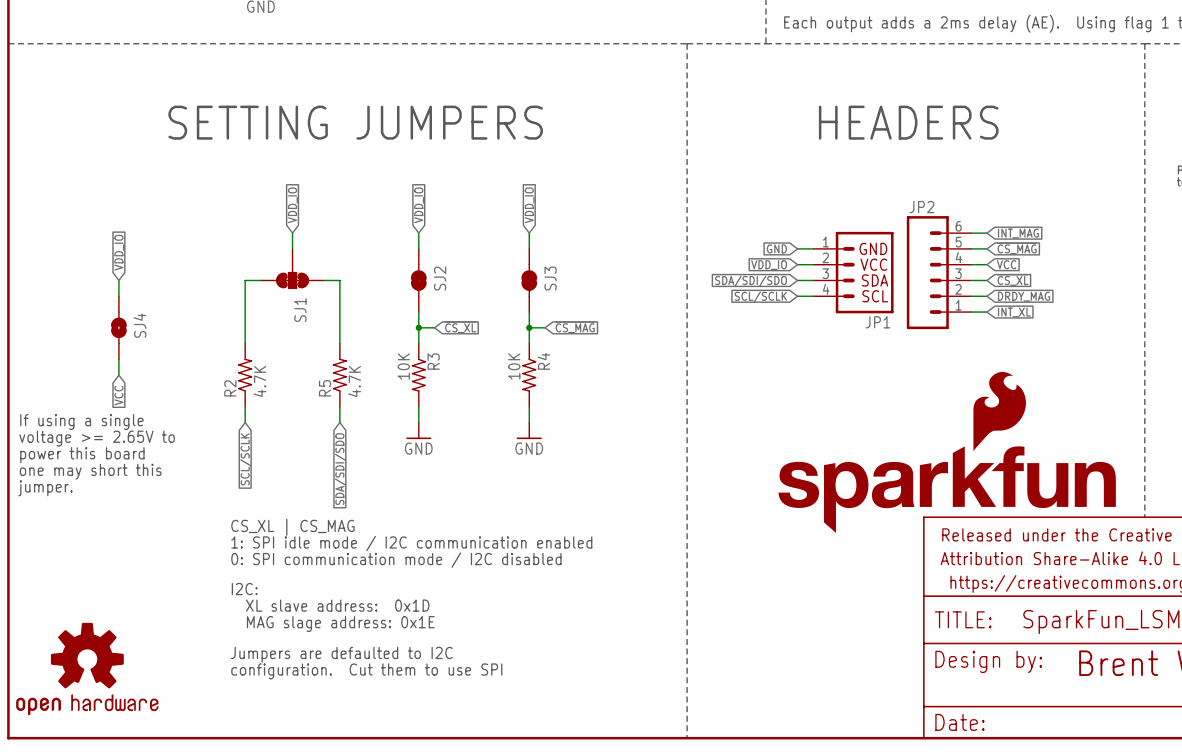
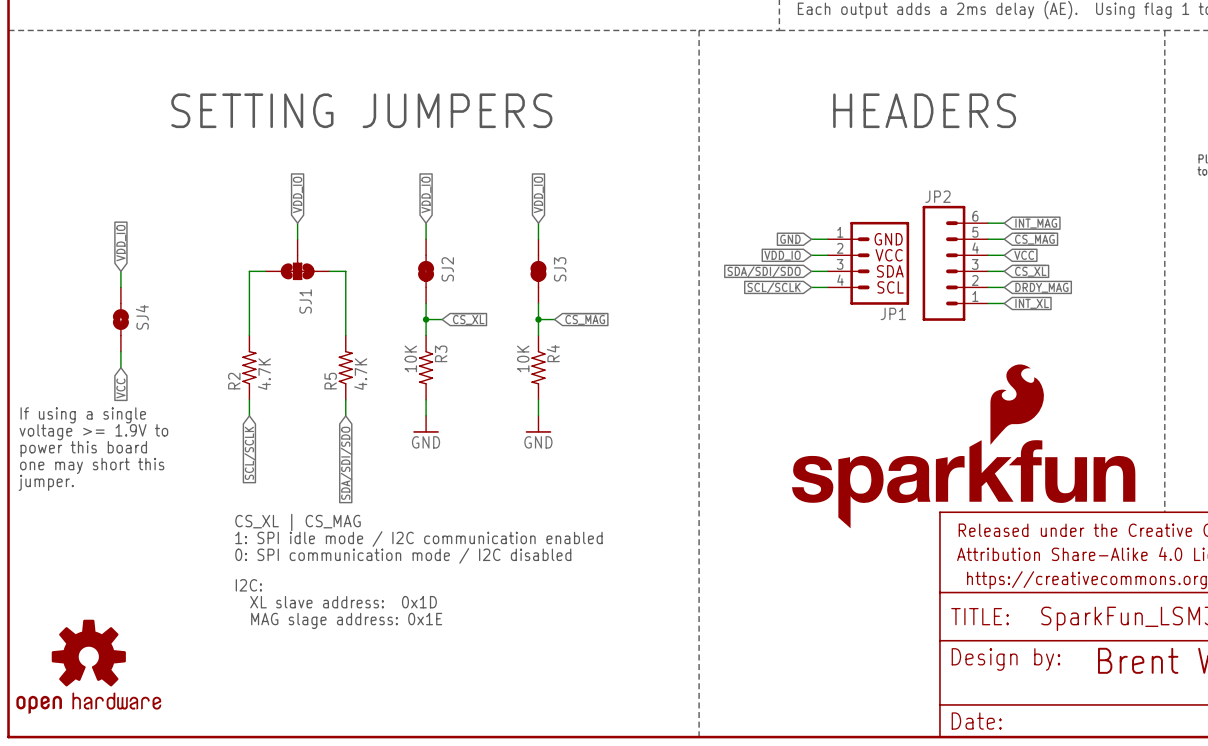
text: voltage >= 2.65V to (97, 438) -> voltage >= 1.9V to (93, 432)
text: Jumpers are defaulted to I2C (341, 654) -> none
text: configuration. Cut them to use SPI (366, 671) -> none

